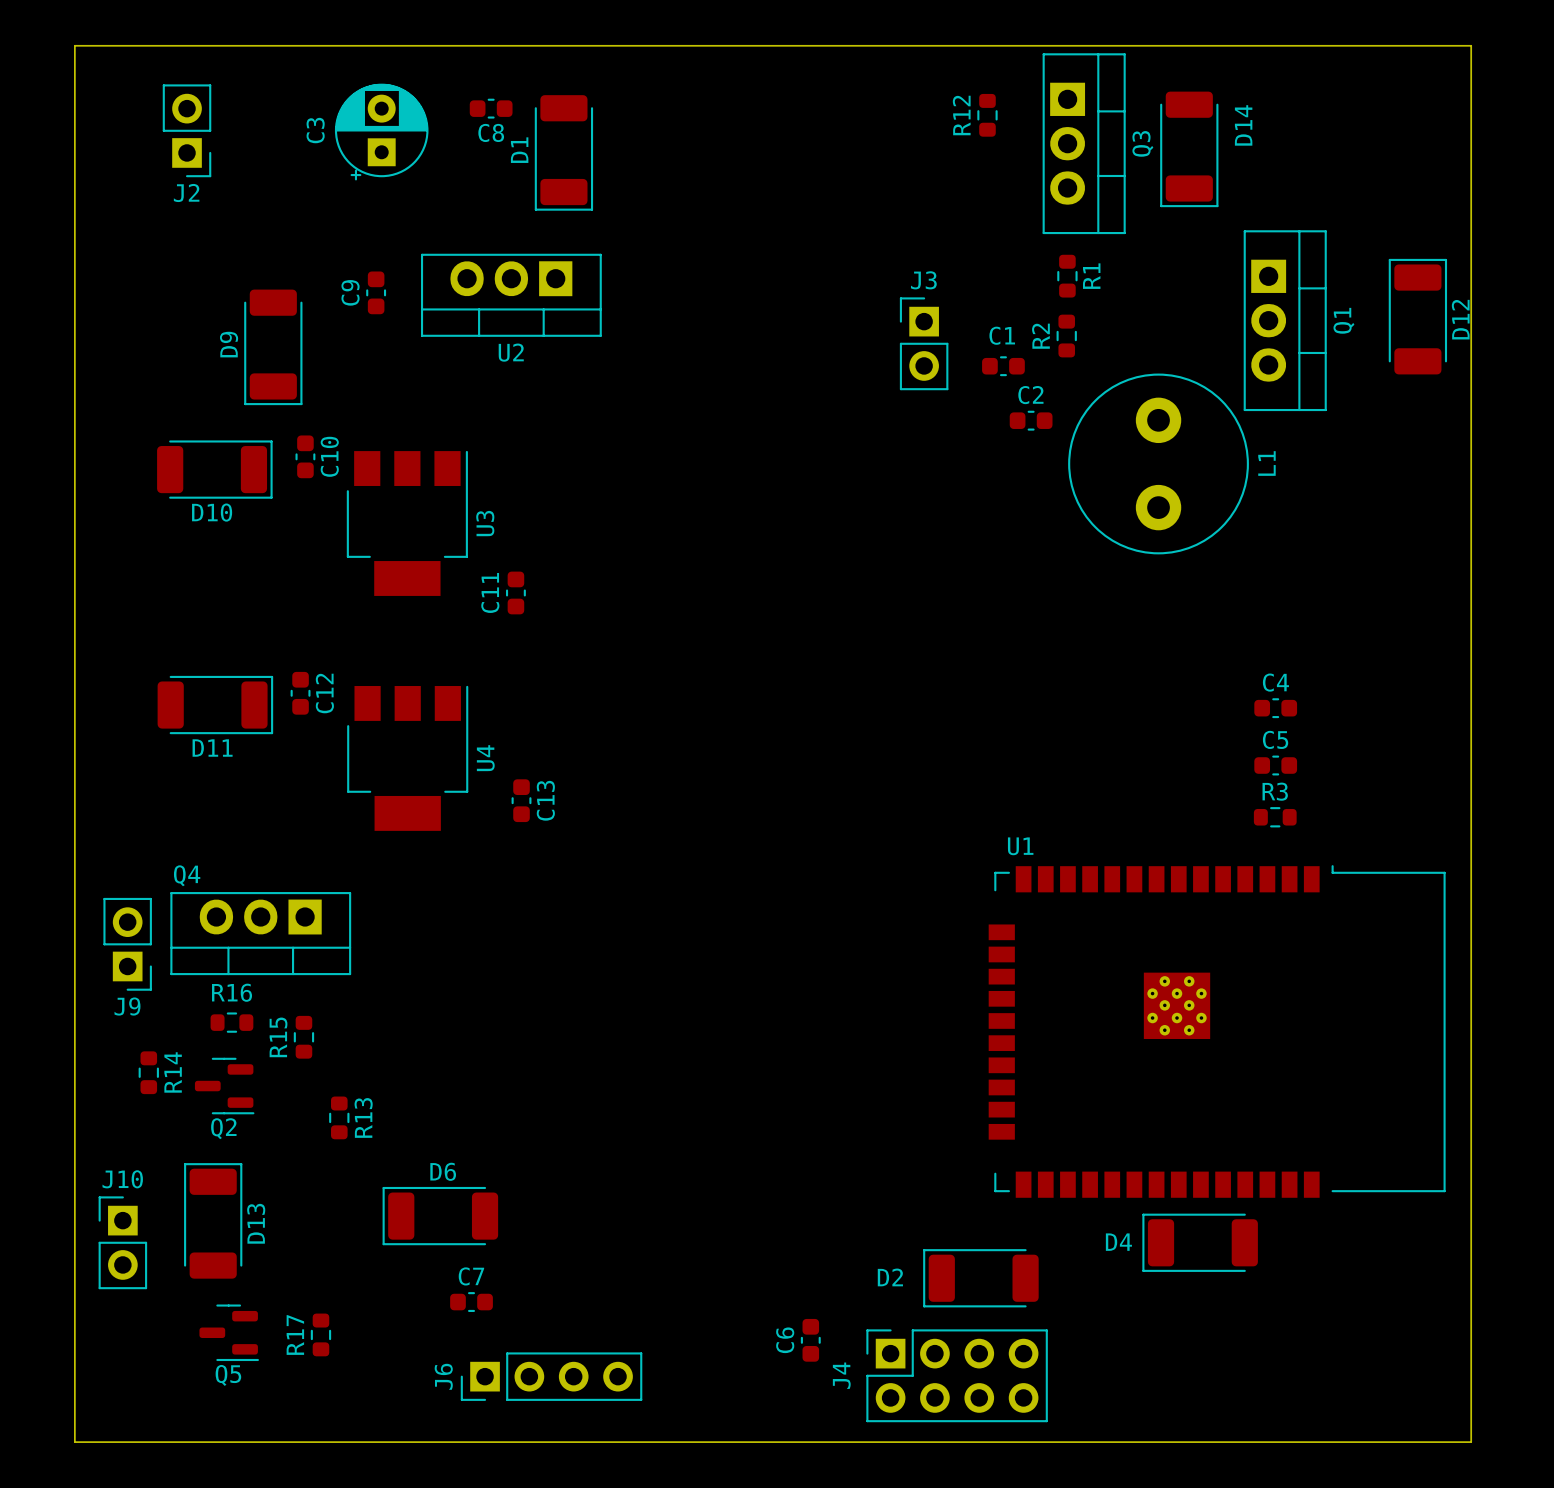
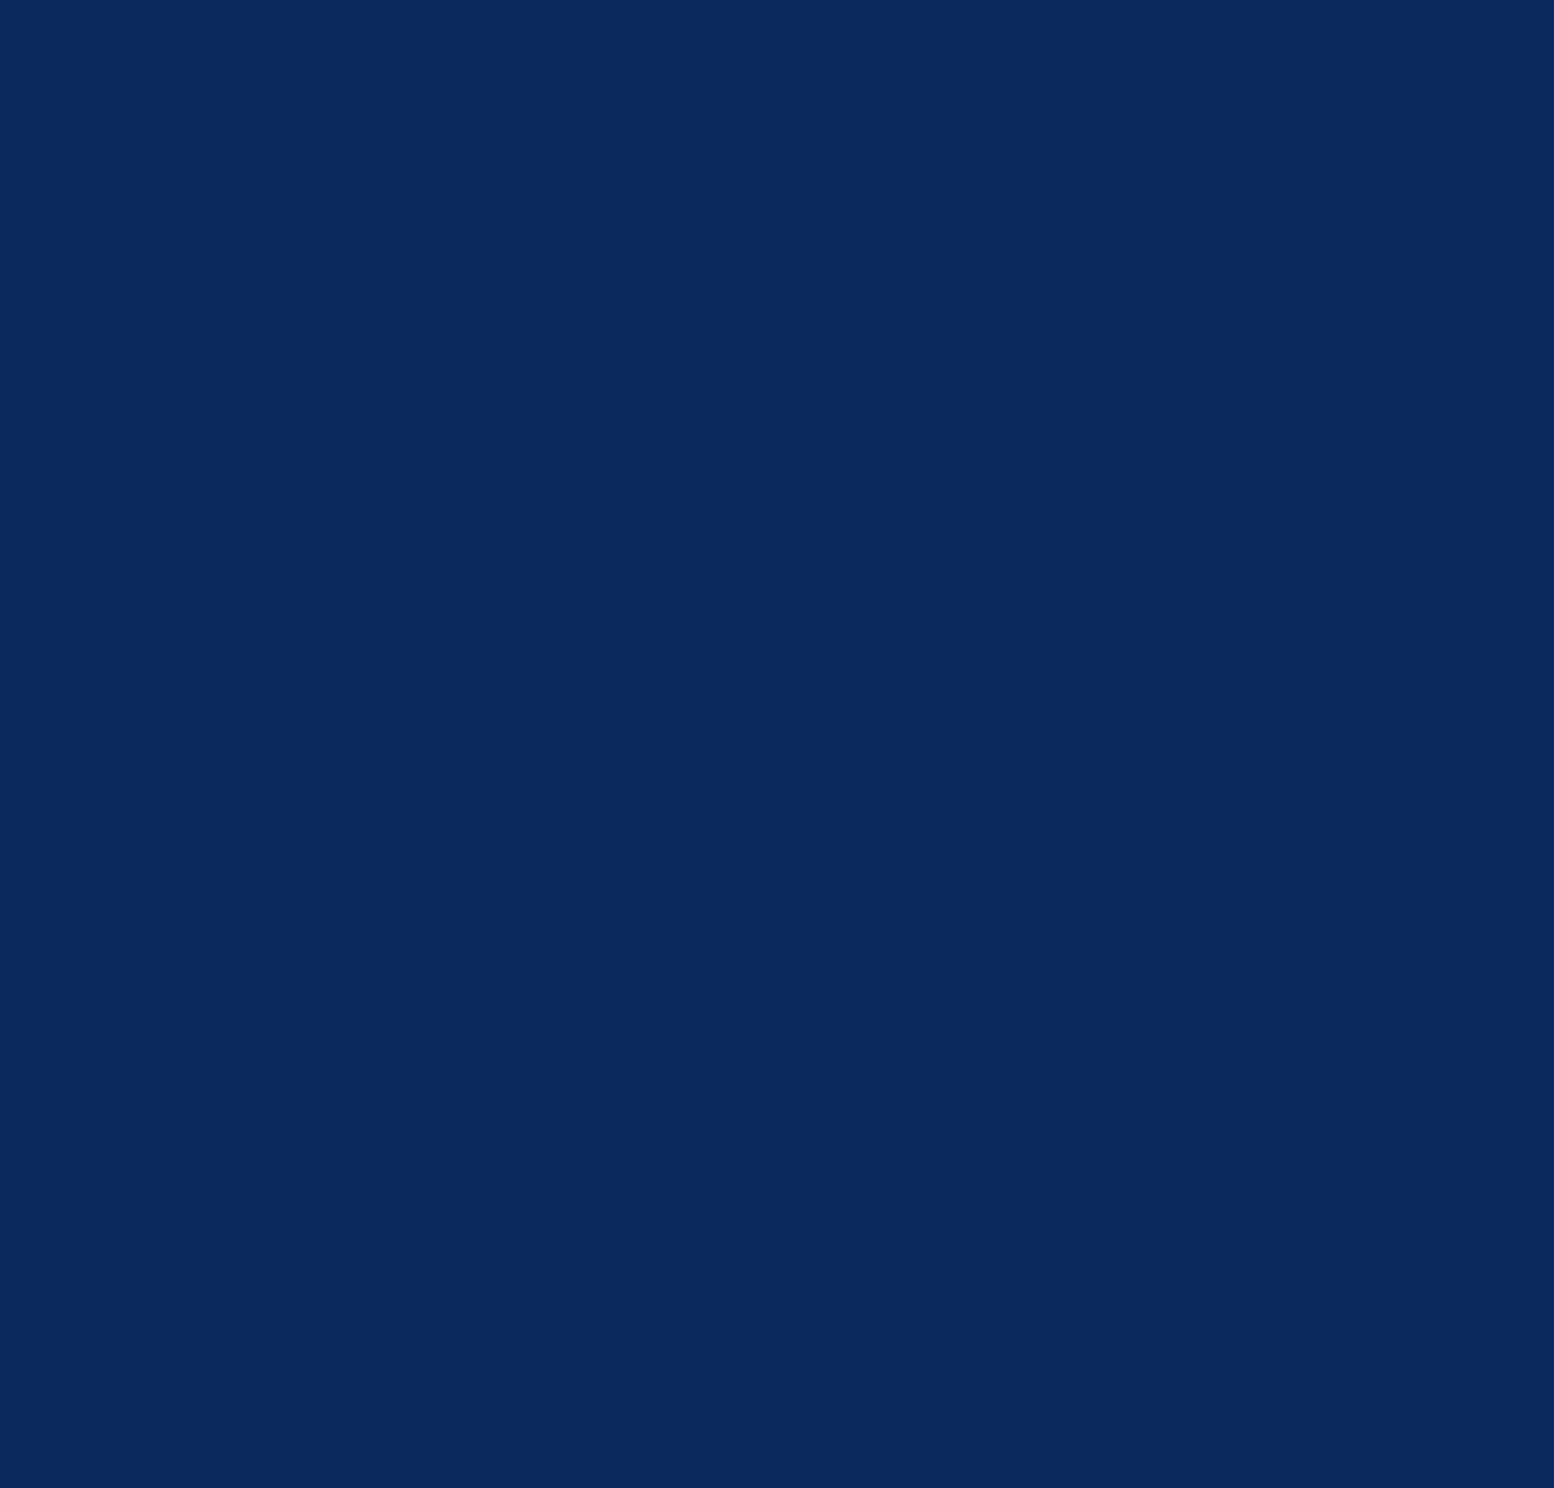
board edge: (74, 45) (1471, 45) (1471, 1442) (74, 1442) (74, 45) -> none
C8: (491, 108) -> none
R12: (987, 115) -> none
J2: (187, 130) -> none
C3: (381, 132) -> none
Q3: (1084, 143) -> none
D14: (1189, 149) -> none
D1: (563, 152) -> none
R1: (1067, 276) -> none
C9: (376, 292) -> none
U2: (511, 295) -> none
D12: (1417, 316) -> none
Q1: (1285, 320) -> none
R2: (1066, 336) -> none
J3: (924, 343) -> none
D9: (273, 347) -> none
C1: (1003, 366) -> none
C2: (1031, 420) -> none
C10: (305, 456) -> none
L1: (1158, 463) -> none
D10: (214, 469) -> none
U3: (407, 523) -> none
C11: (515, 592) -> none
C12: (300, 693) -> none
D11: (215, 705) -> none
C4: (1275, 708) -> none
U4: (407, 758) -> none
C5: (1275, 765) -> none
C13: (521, 800) -> none
R3: (1275, 817) -> none
Q4: (260, 933) -> none
J9: (127, 944) -> none
R16: (231, 1022) -> none
U1: (1217, 1031) -> none
R15: (303, 1037) -> none
R14: (148, 1072) -> none
Q2: (224, 1086) -> none
R13: (339, 1117) -> none
D6: (440, 1216) -> none
D13: (213, 1220) -> none
J10: (122, 1242) -> none
D4: (1200, 1242) -> none
D2: (980, 1278) -> none
C7: (471, 1302) -> none
Q5: (229, 1332) -> none
R17: (320, 1334) -> none
C6: (810, 1340) -> none
J4: (957, 1375) -> none
J6: (551, 1376) -> none

